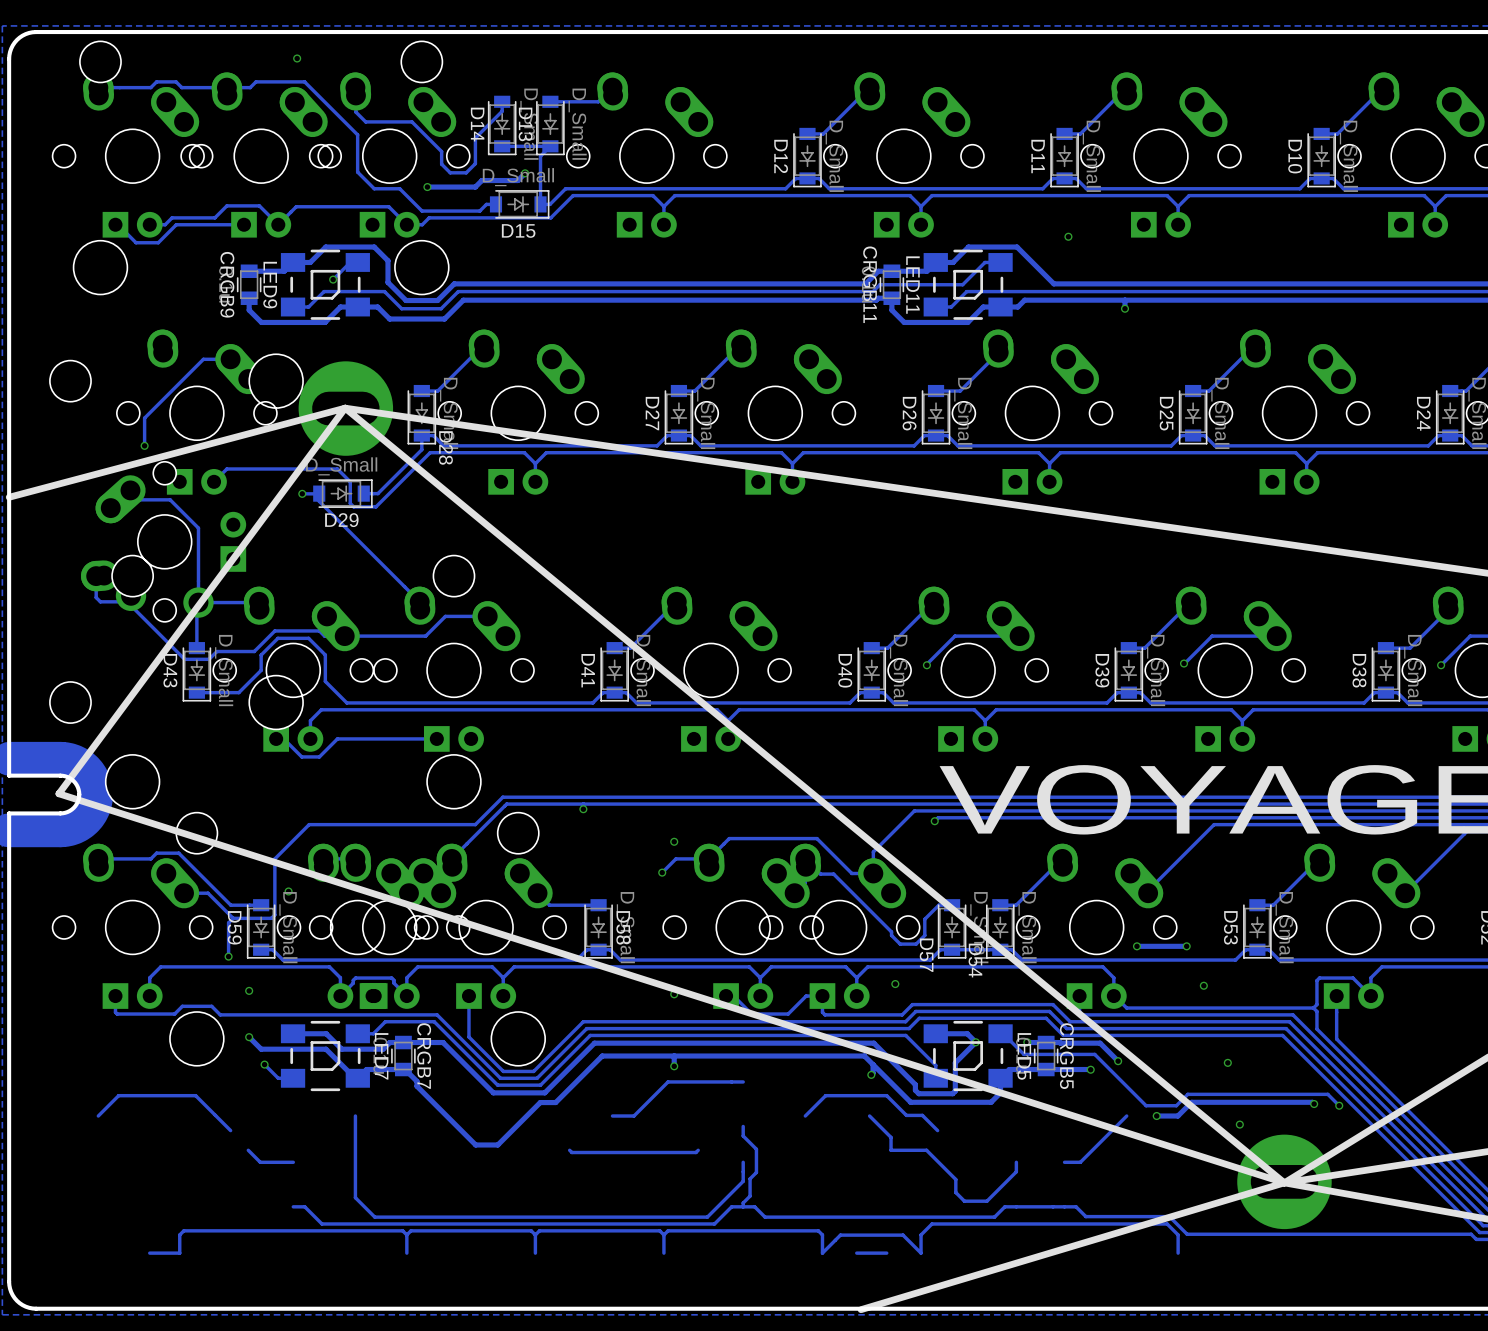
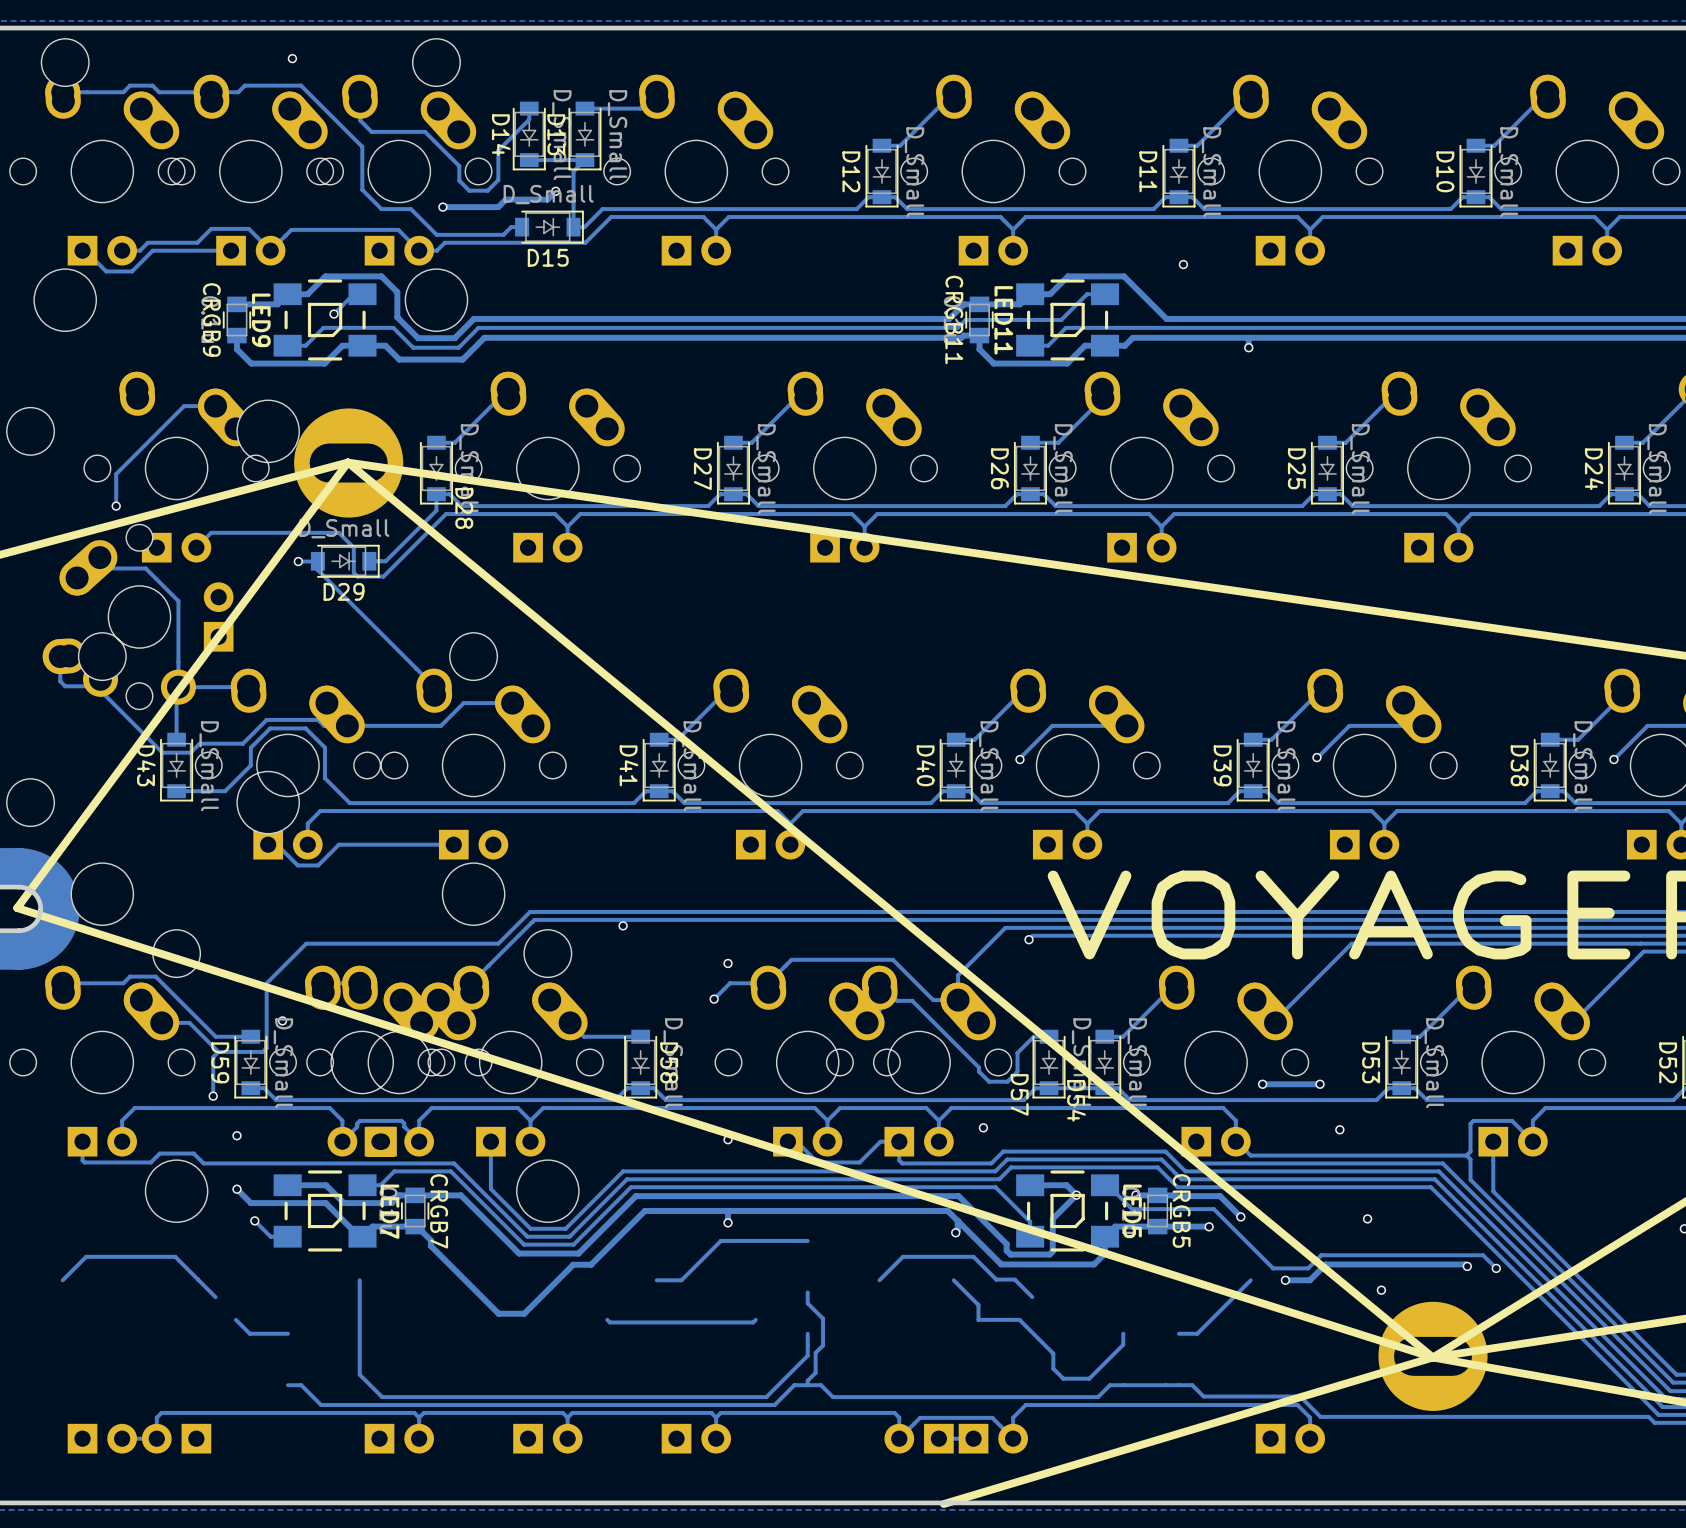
part: none -> (102, 1438)
part: none -> (176, 1438)
part: none -> (399, 1438)
part: none -> (547, 1438)
part: none -> (696, 1438)
part: none -> (919, 1438)
part: none -> (993, 1438)
part: none -> (1290, 1438)

